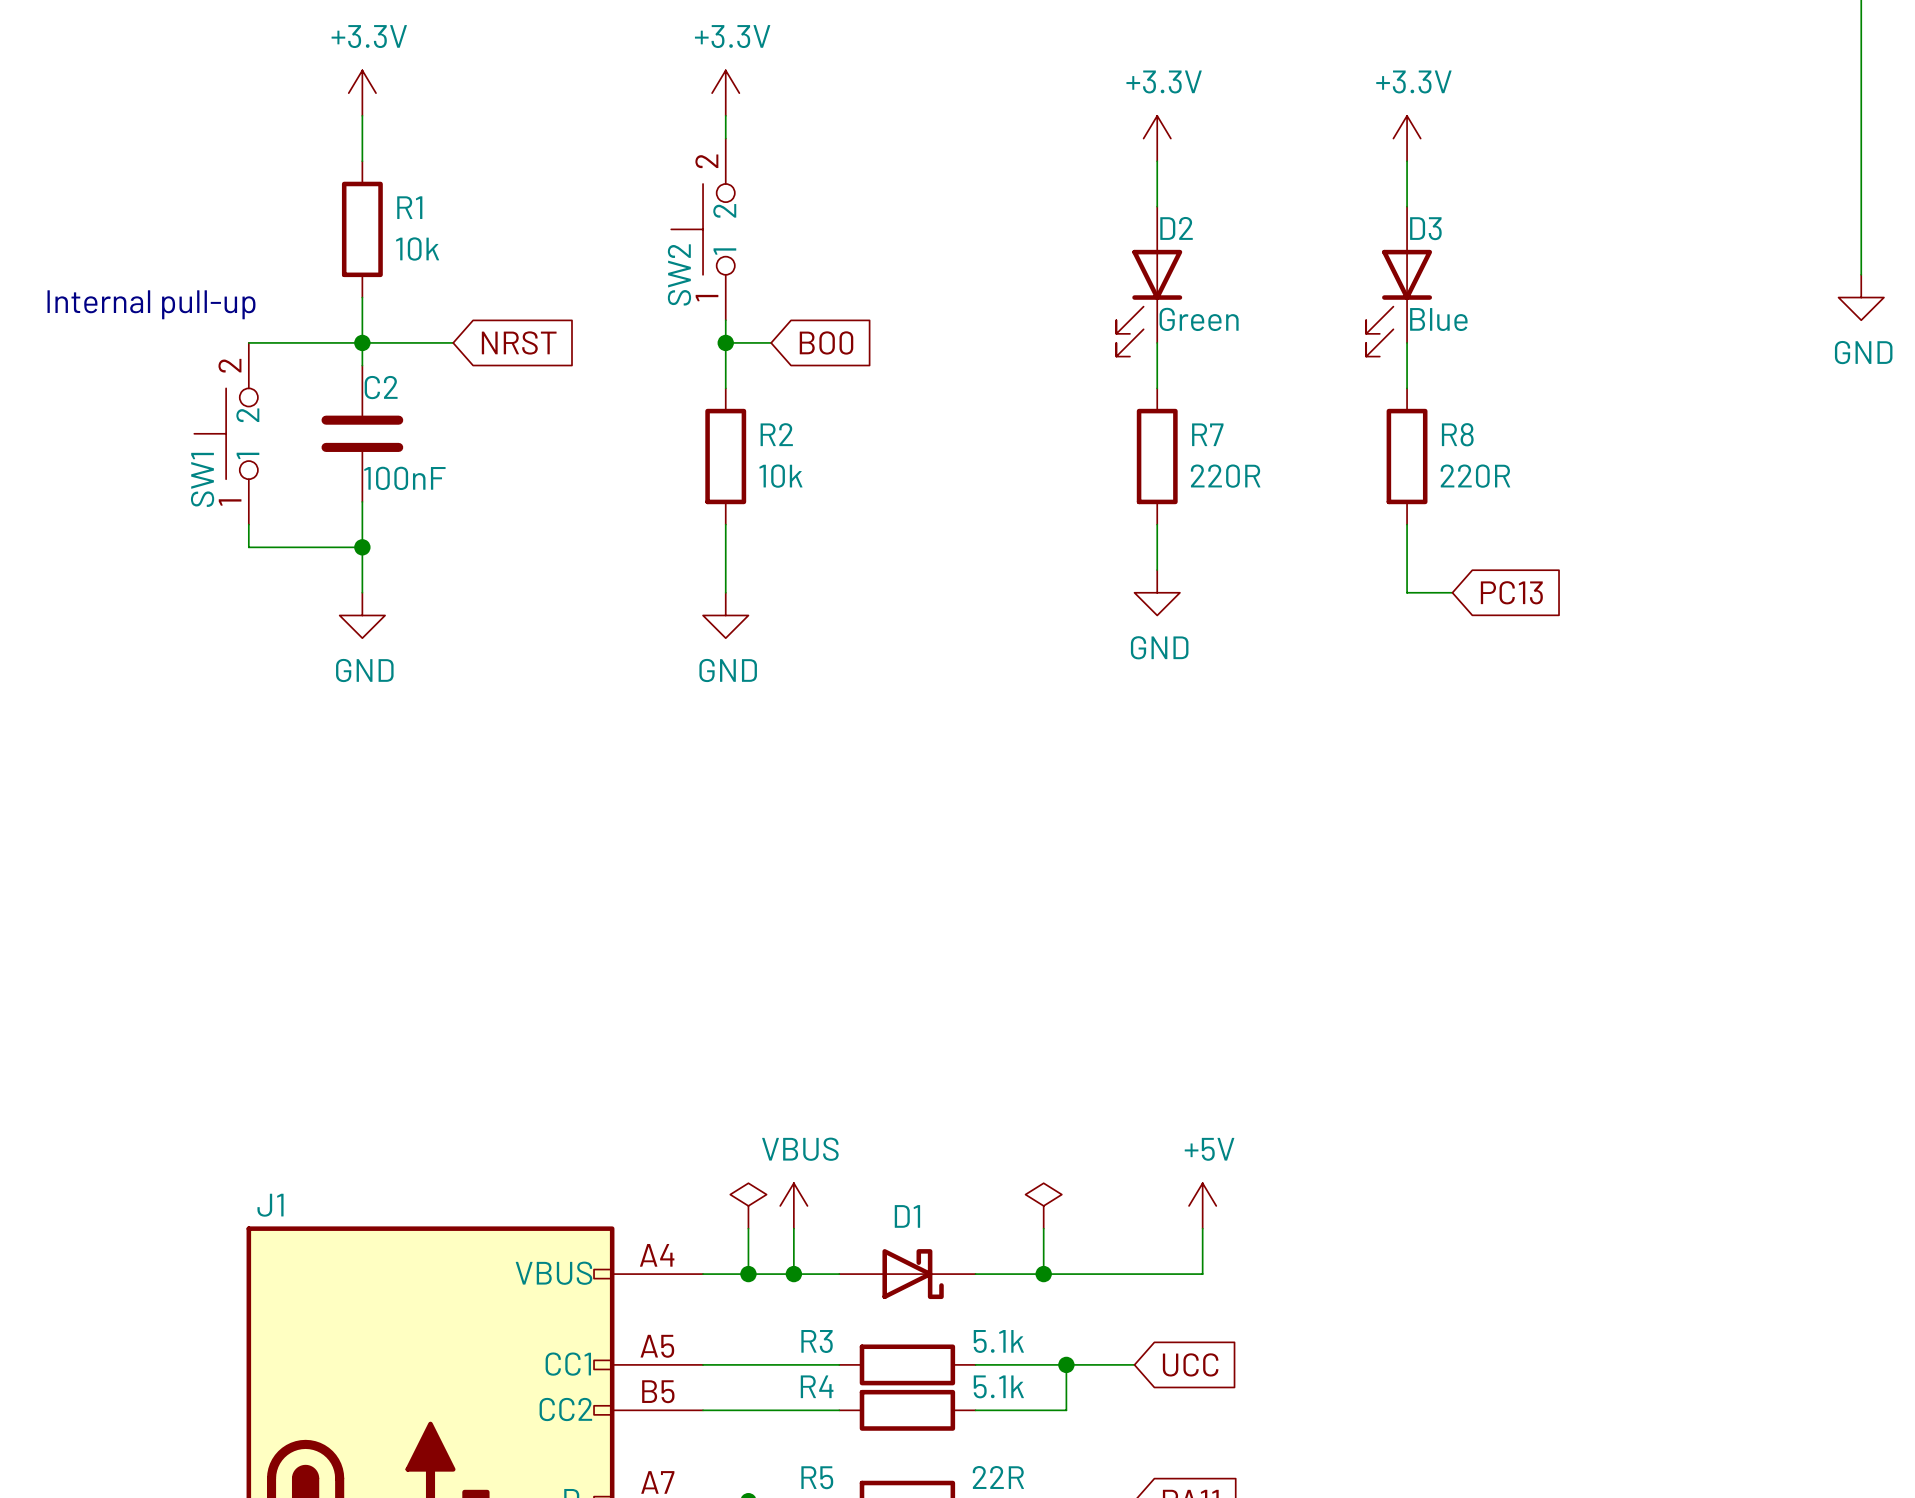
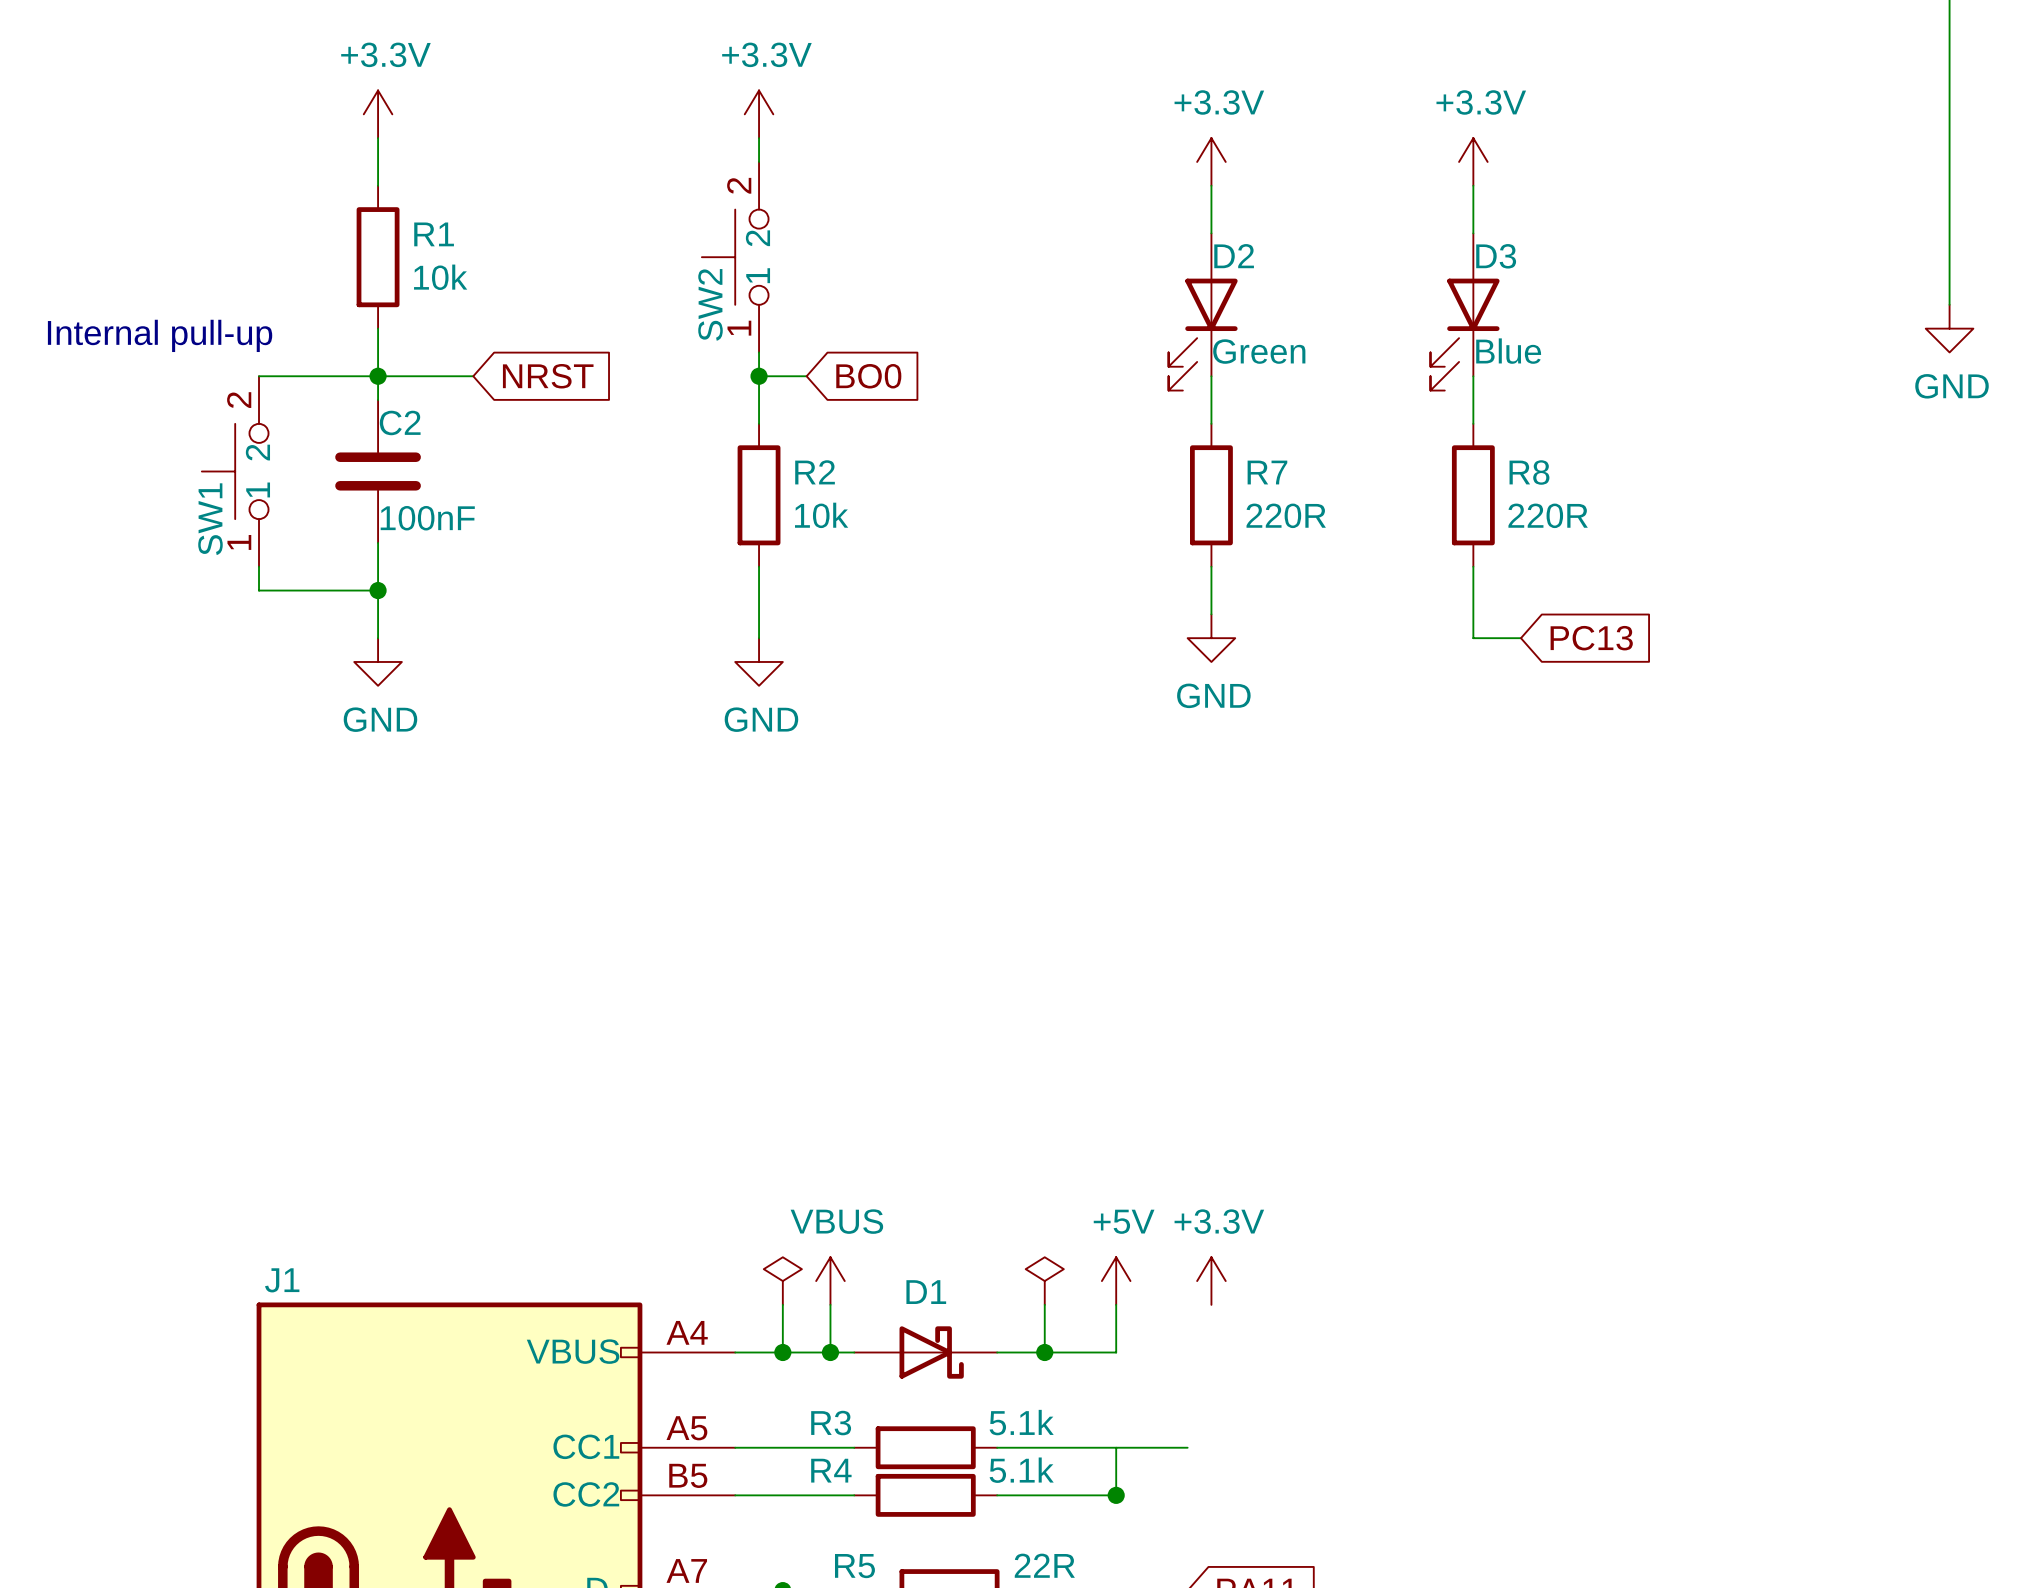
power symbol position: (1043, 1205) -> (1044, 1281)
power symbol: none -> +3.3V (1211, 1281)
power symbol position: +5V (1202, 1205) -> +5V (1116, 1281)
wire: (1043, 1228) (1043, 1274) -> (1044, 1304) (1044, 1352)
wire: (1202, 1228) (1202, 1274) (1066, 1274) -> (1116, 1304) (1116, 1352)
D1 position: (907, 1274) -> (925, 1352)
junction position: (1043, 1274) -> (1044, 1352)
R3 position: (907, 1364) -> (925, 1447)
junction position: (1066, 1364) -> (1116, 1495)
global label: UCC (1190, 1364) -> none
R4 position: (907, 1410) -> (925, 1495)

